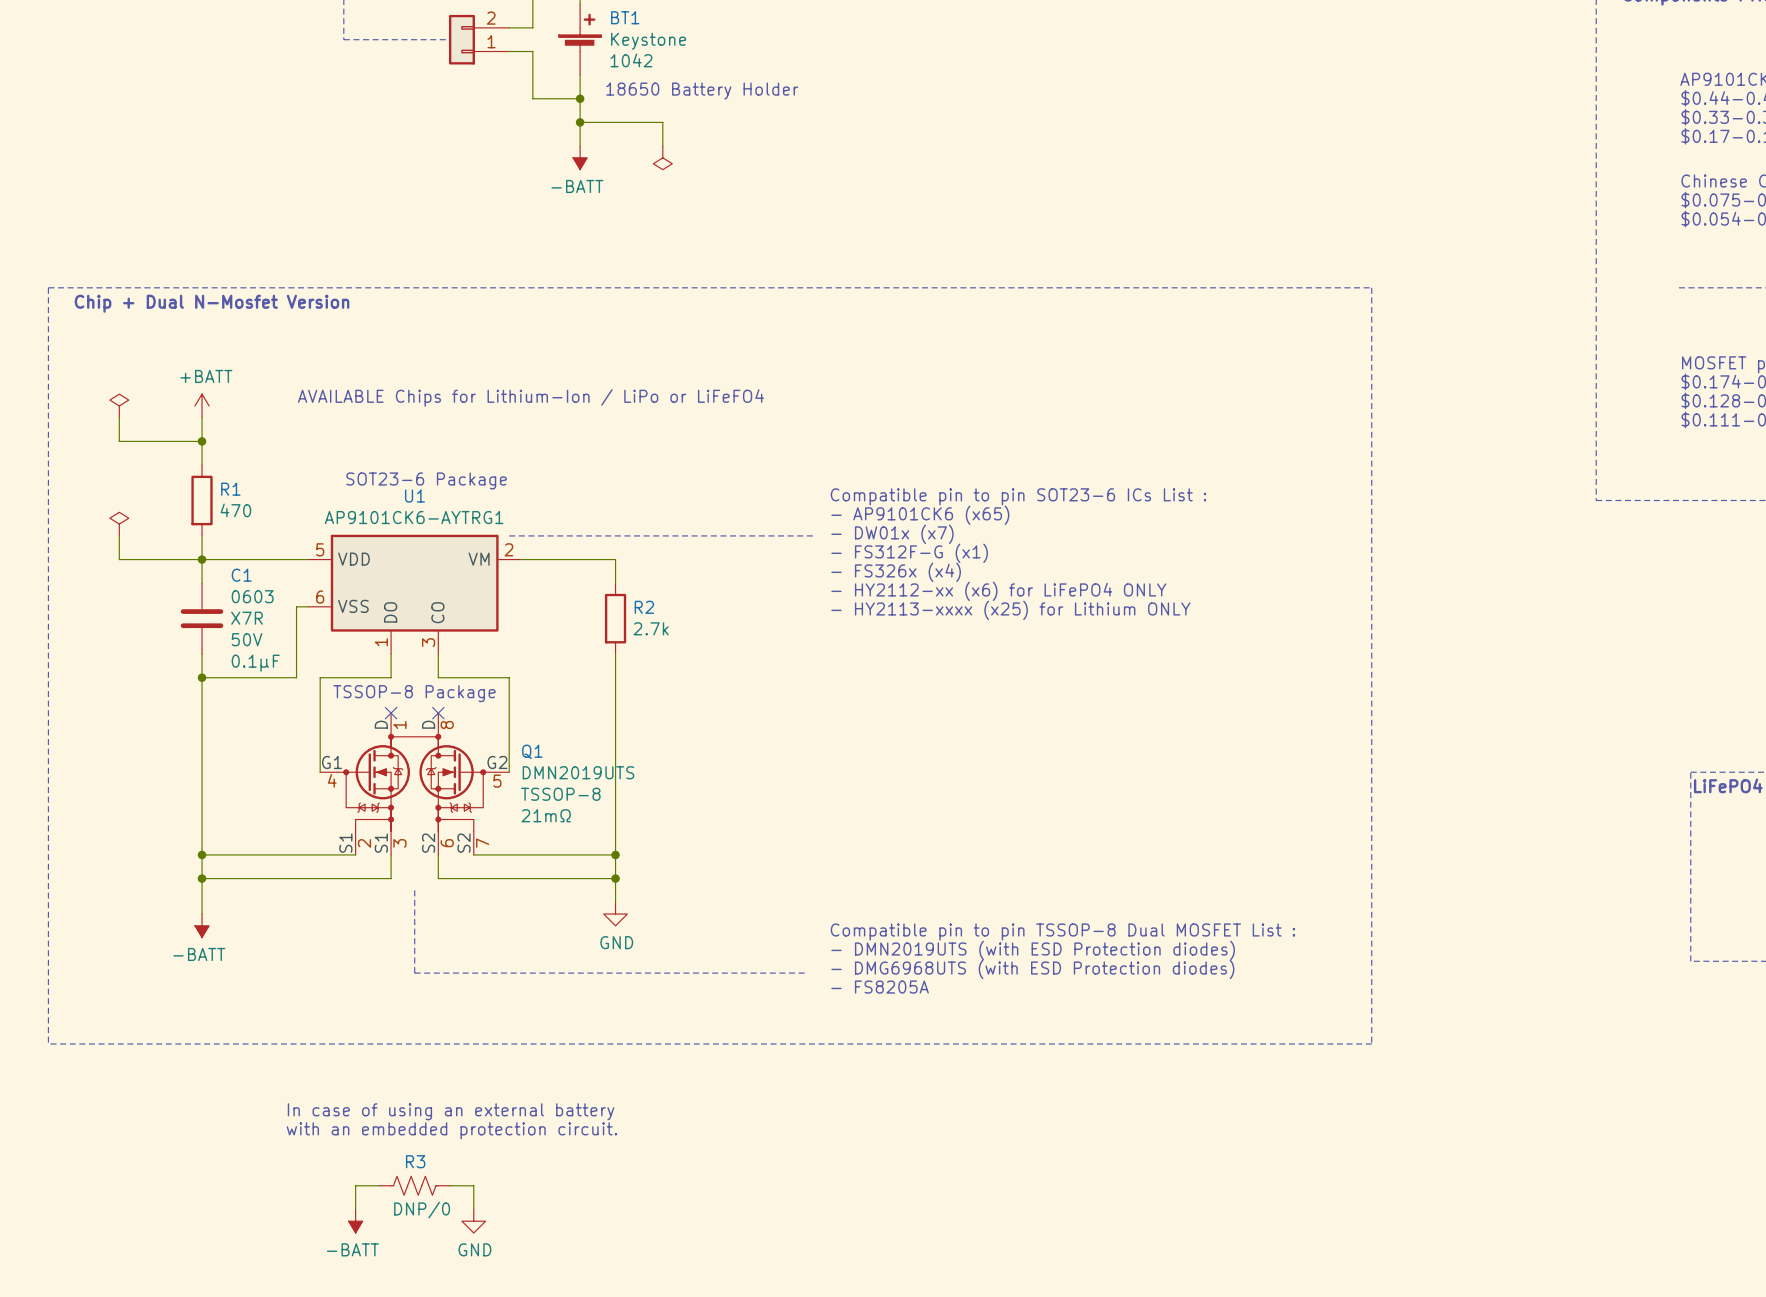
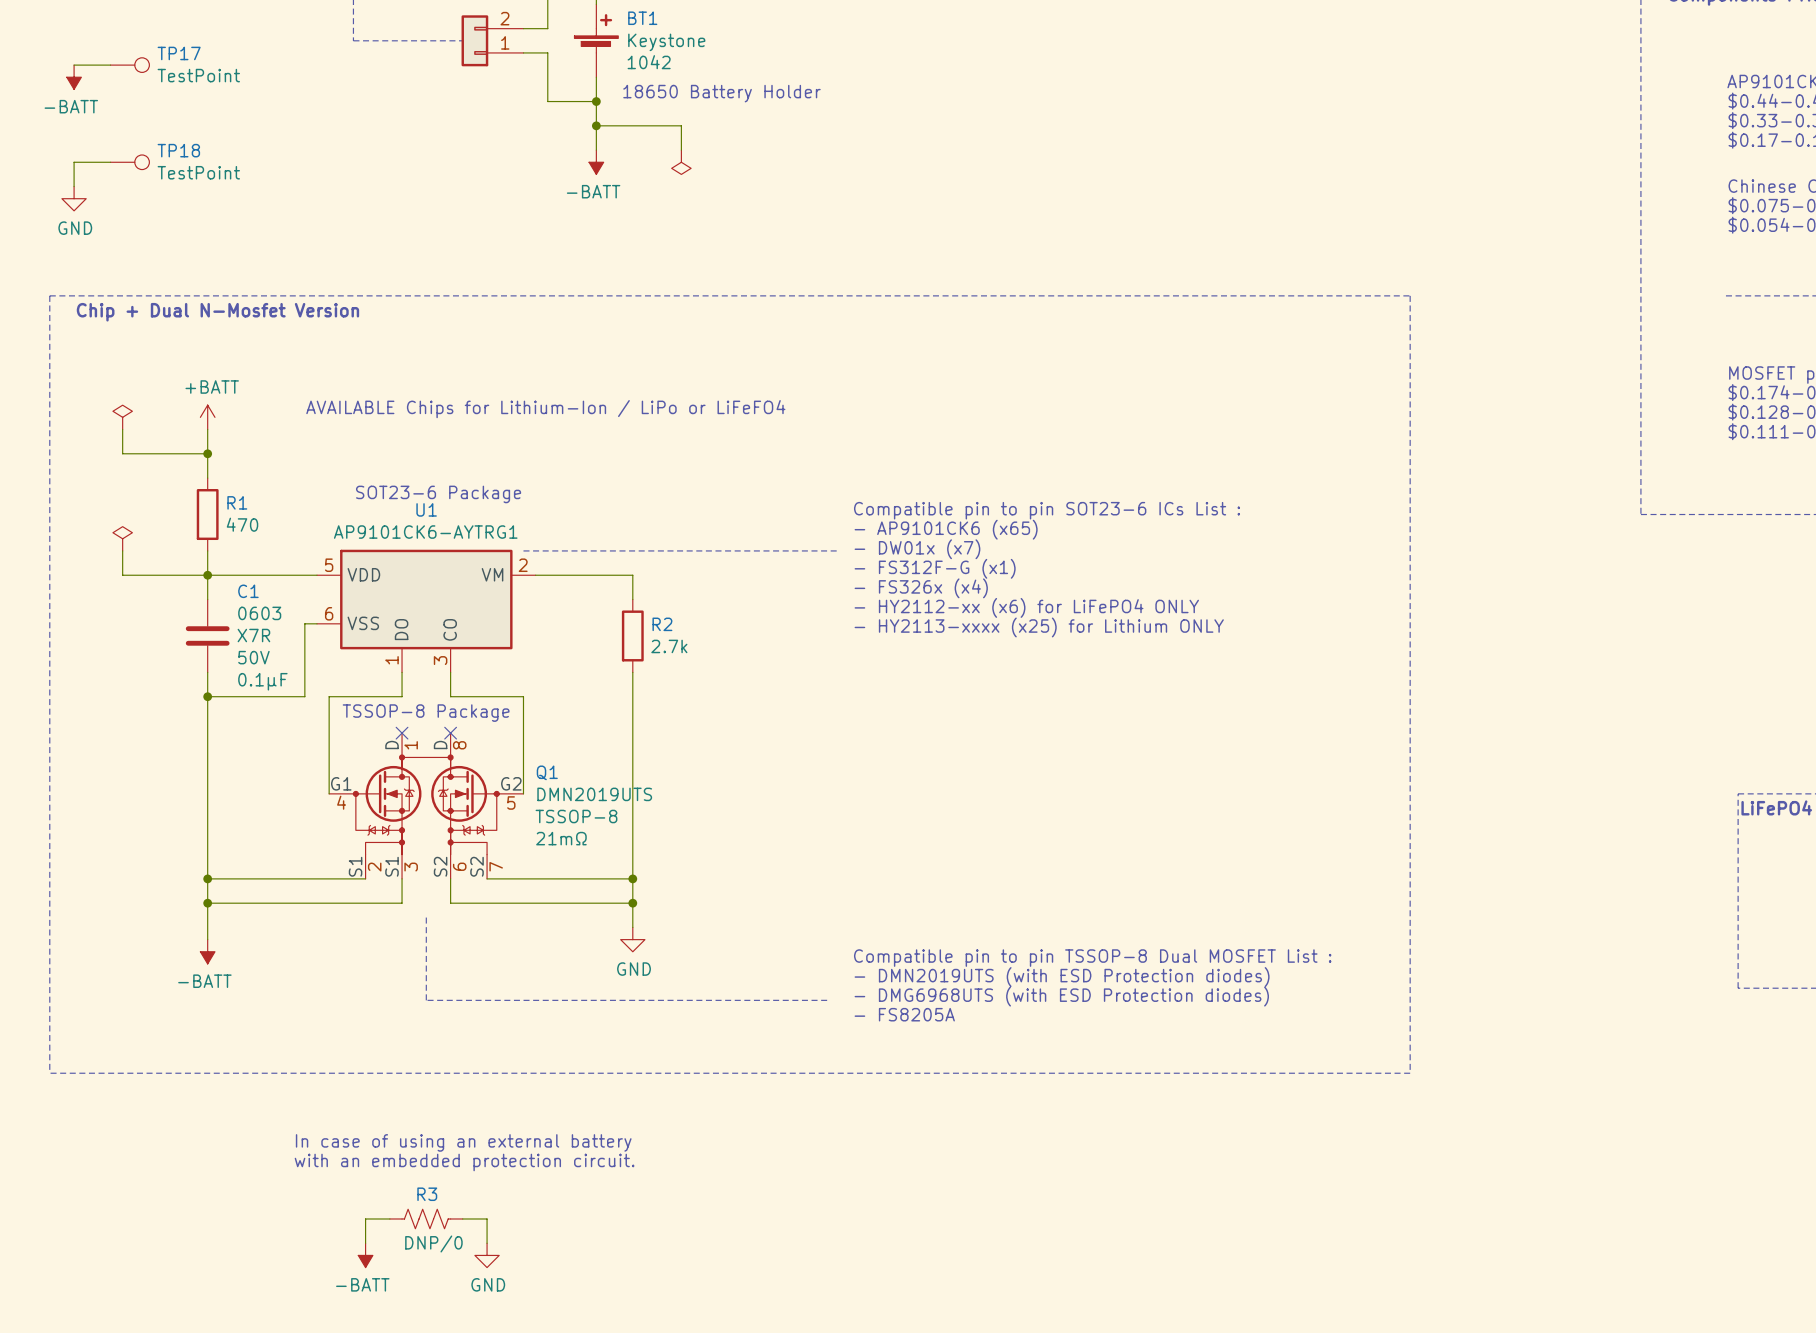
wire: none -> (74, 65) (110, 65)
TP17: none -> TestPoint (129, 65)
power symbol: none -> -BATT (74, 77)
wire: none -> (110, 162) (74, 162) (74, 186)
TP18: none -> TestPoint (129, 162)
power symbol: none -> GND (74, 198)

